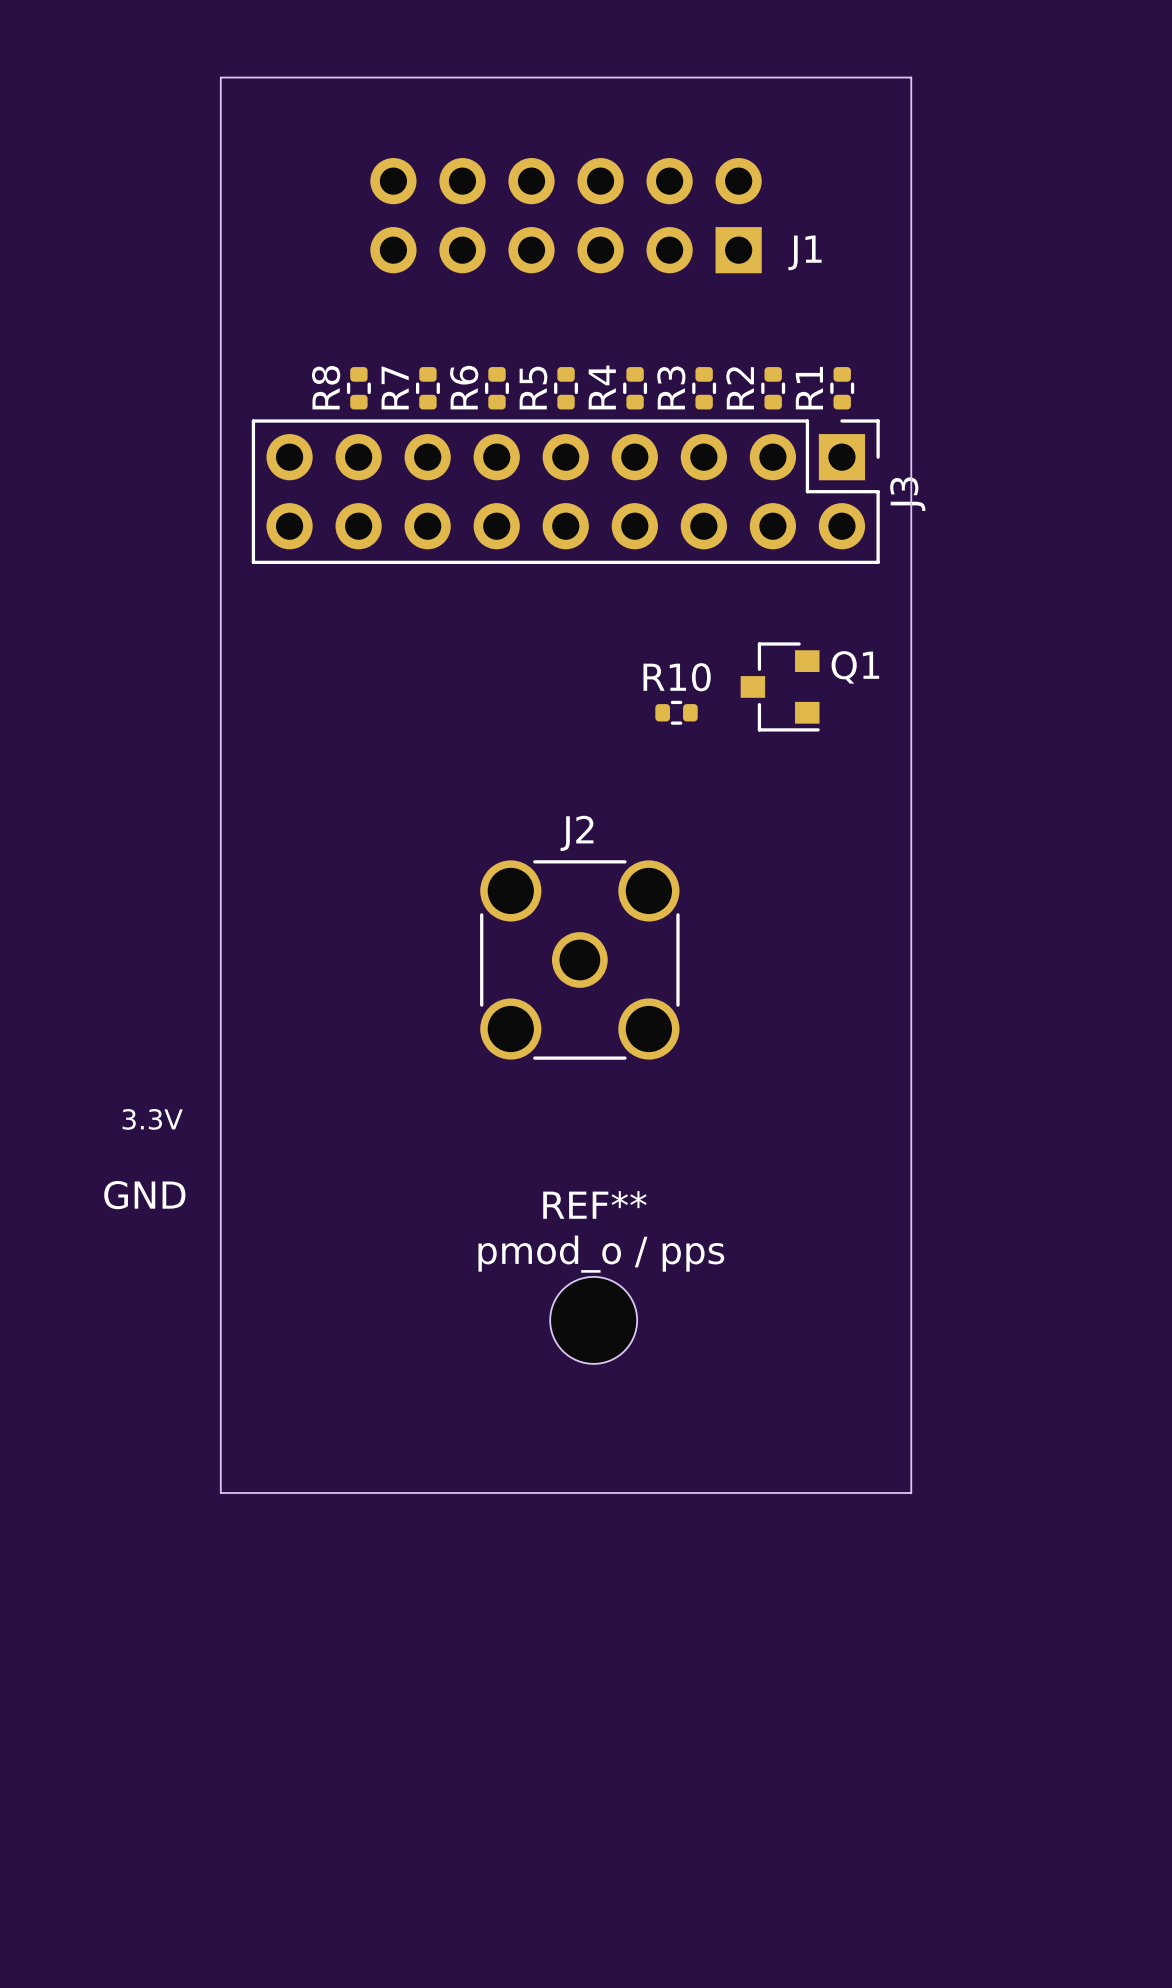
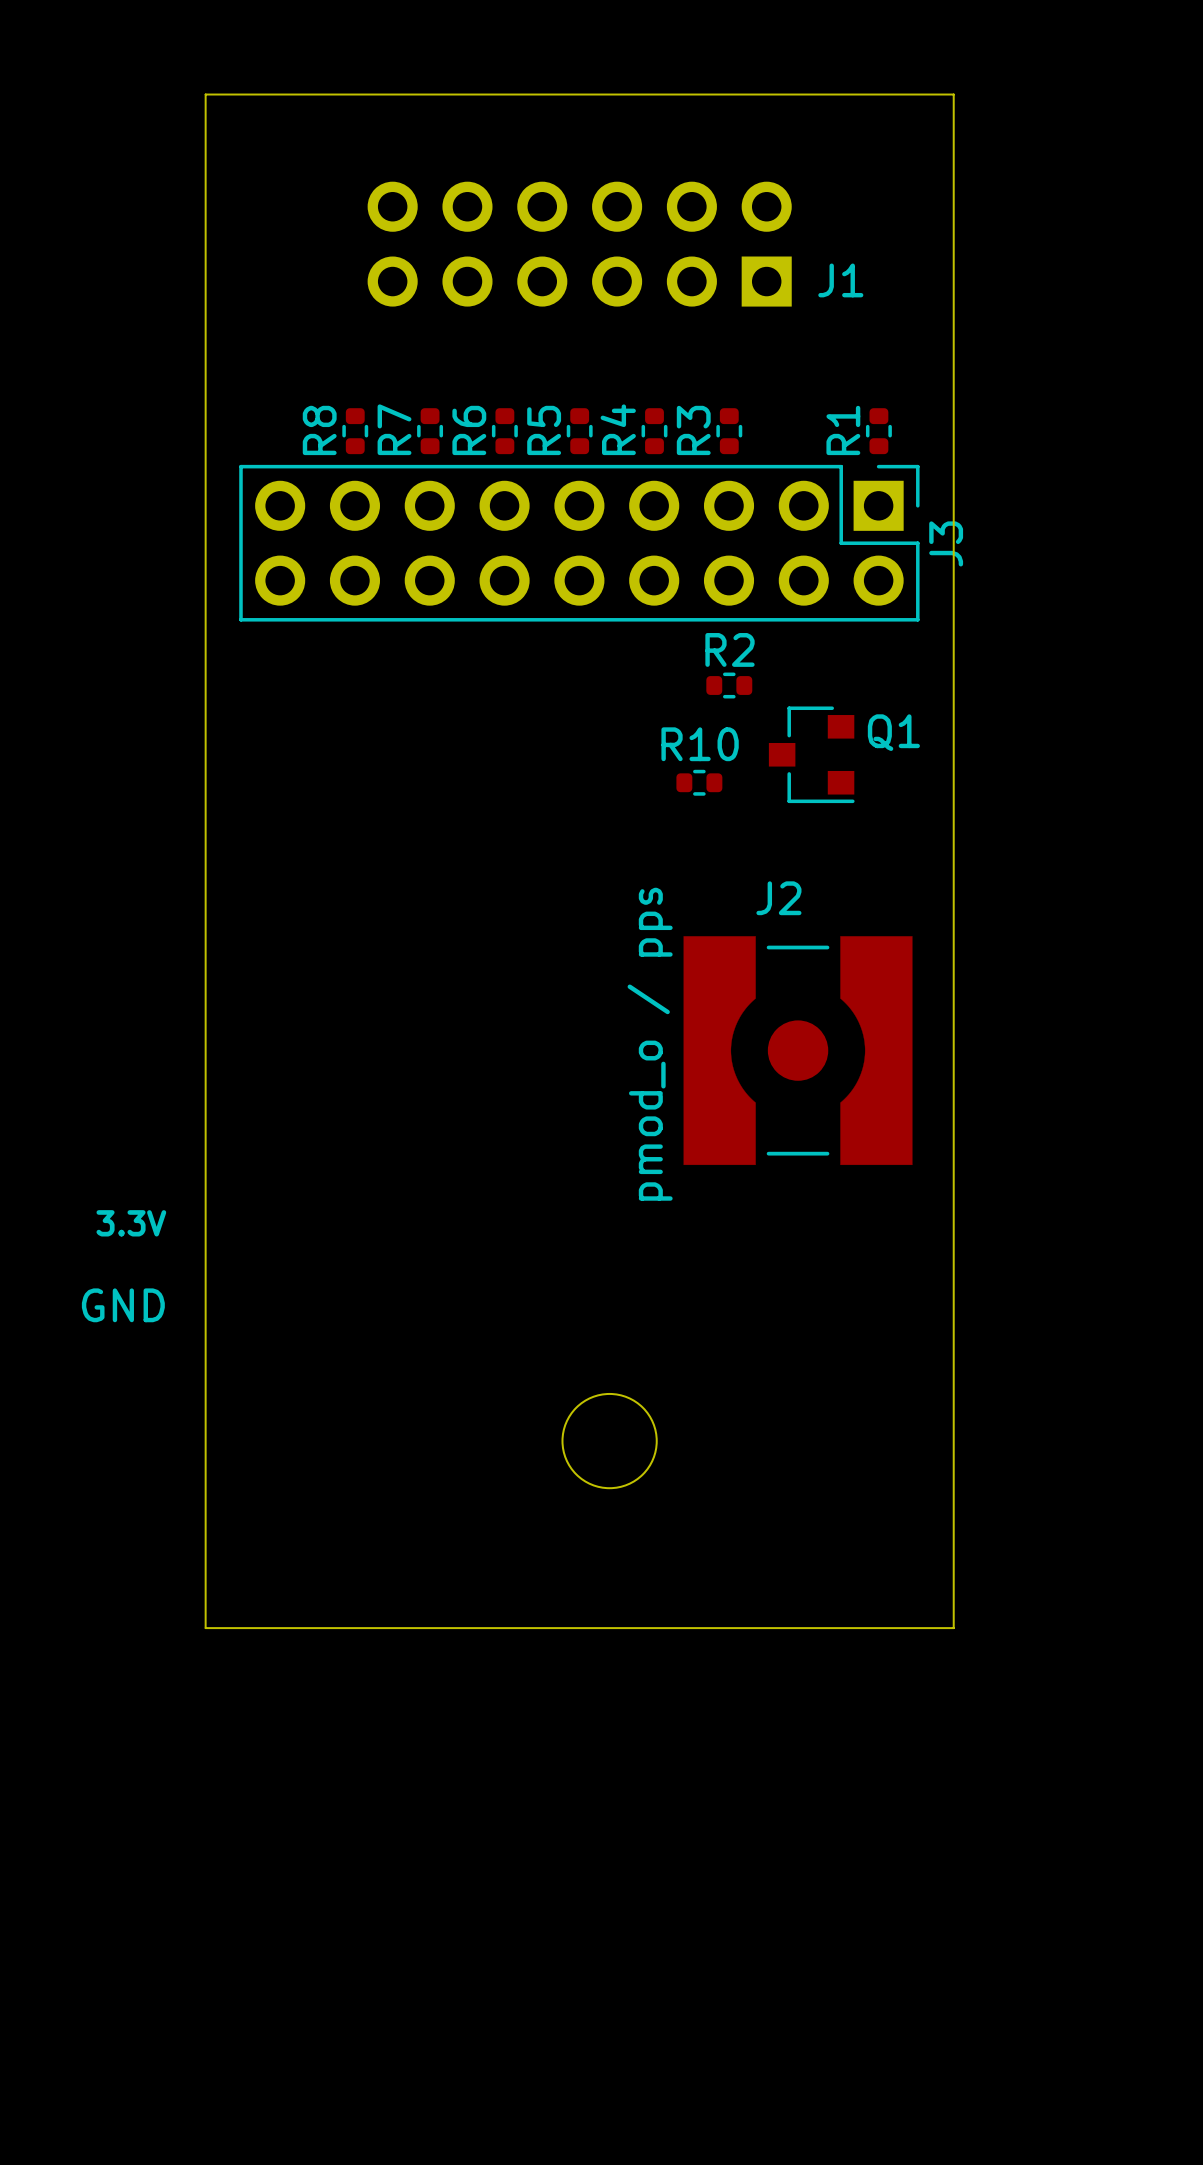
R2 rotation: 0° (773, 388) -> 90° clockwise (729, 685)
R2 position: (773, 388) -> (729, 685)
J2 footprint: [480, 860, 680, 1060] -> [683, 936, 913, 1166]
REF** name: REF** (594, 1204) -> none
text rotation: 0° (601, 1254) -> 90° counterclockwise (650, 1044)

